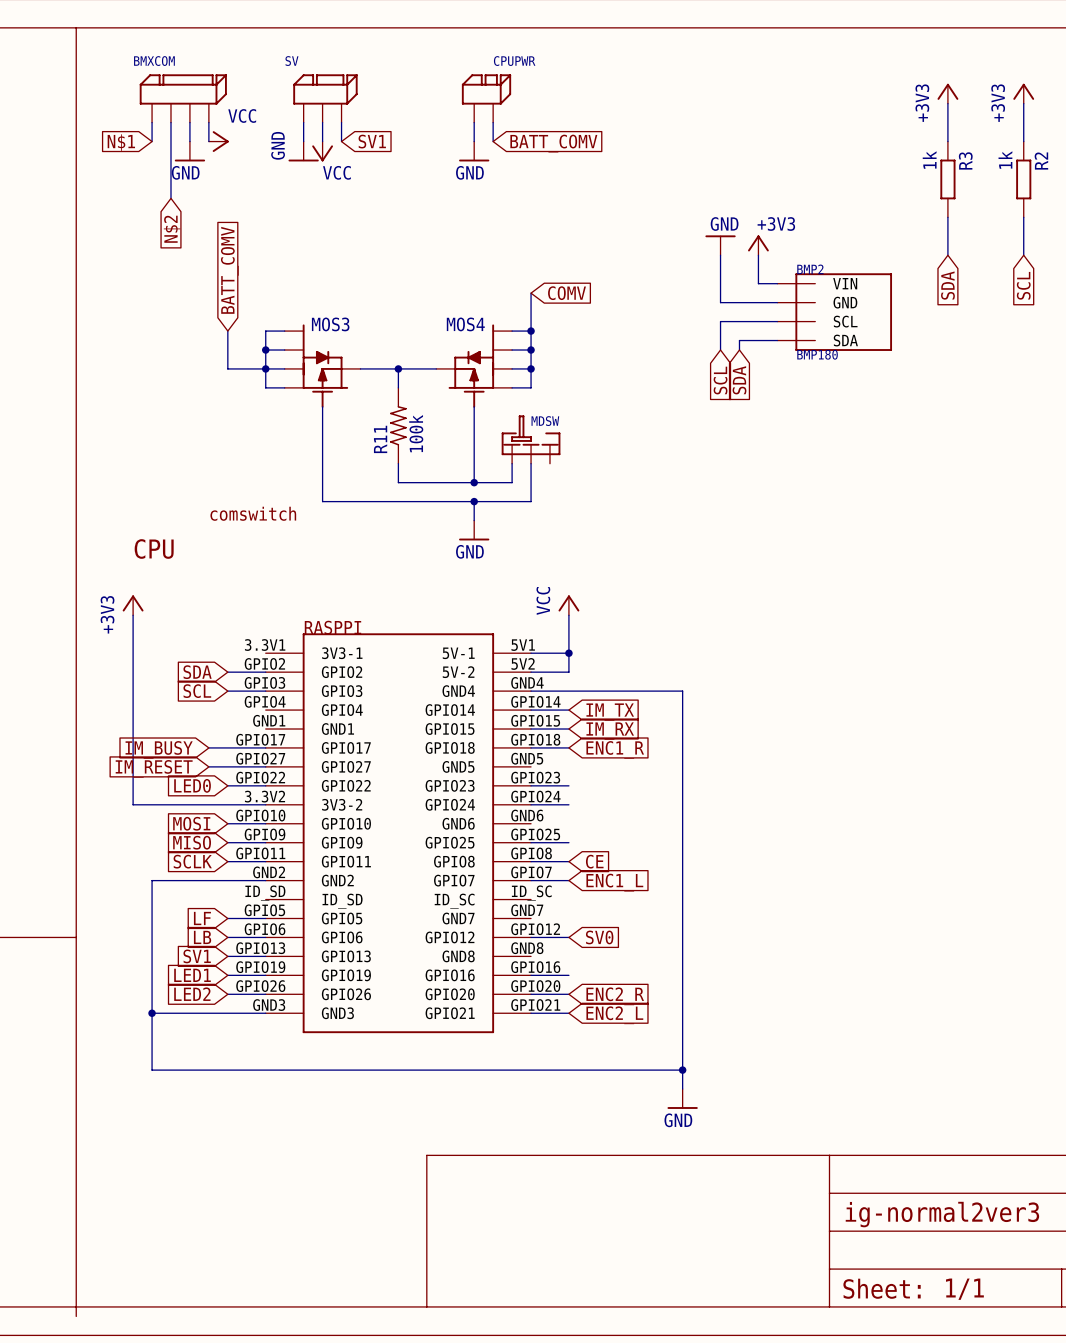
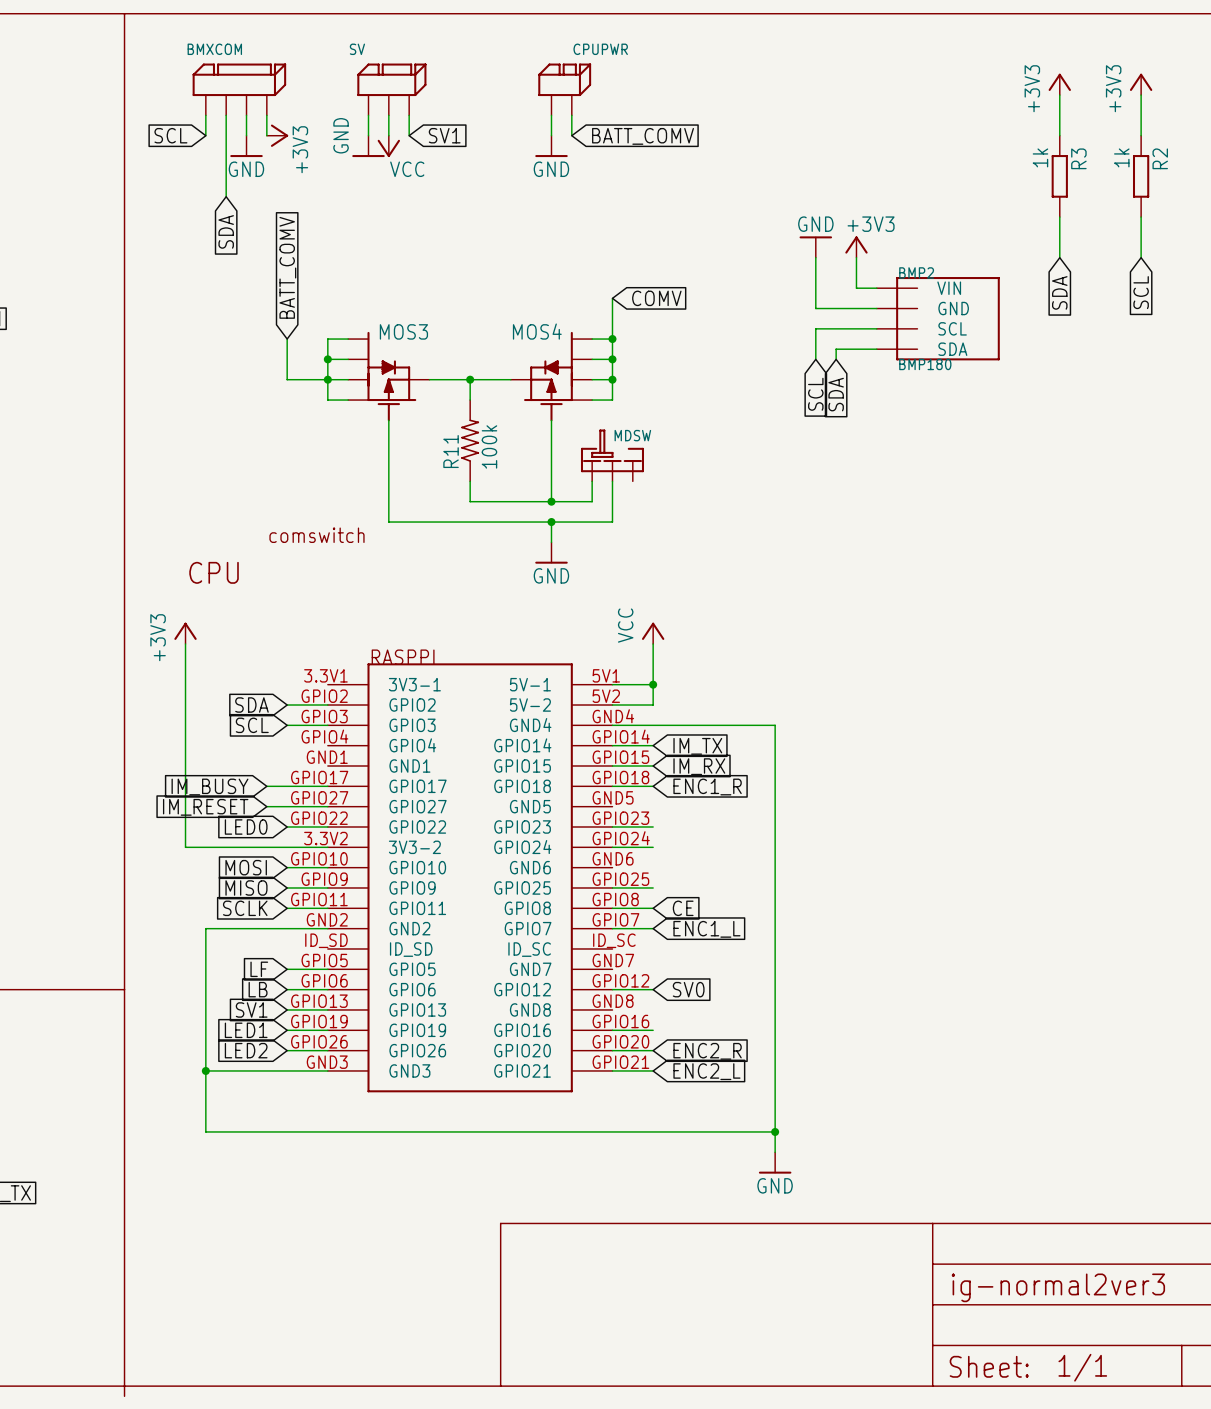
power symbol: VCC (218, 141) -> +3V3 (277, 135)
global label: N$1 (121, 142) -> SCL (170, 135)
global label: N$2 (172, 229) -> SDA (226, 231)

